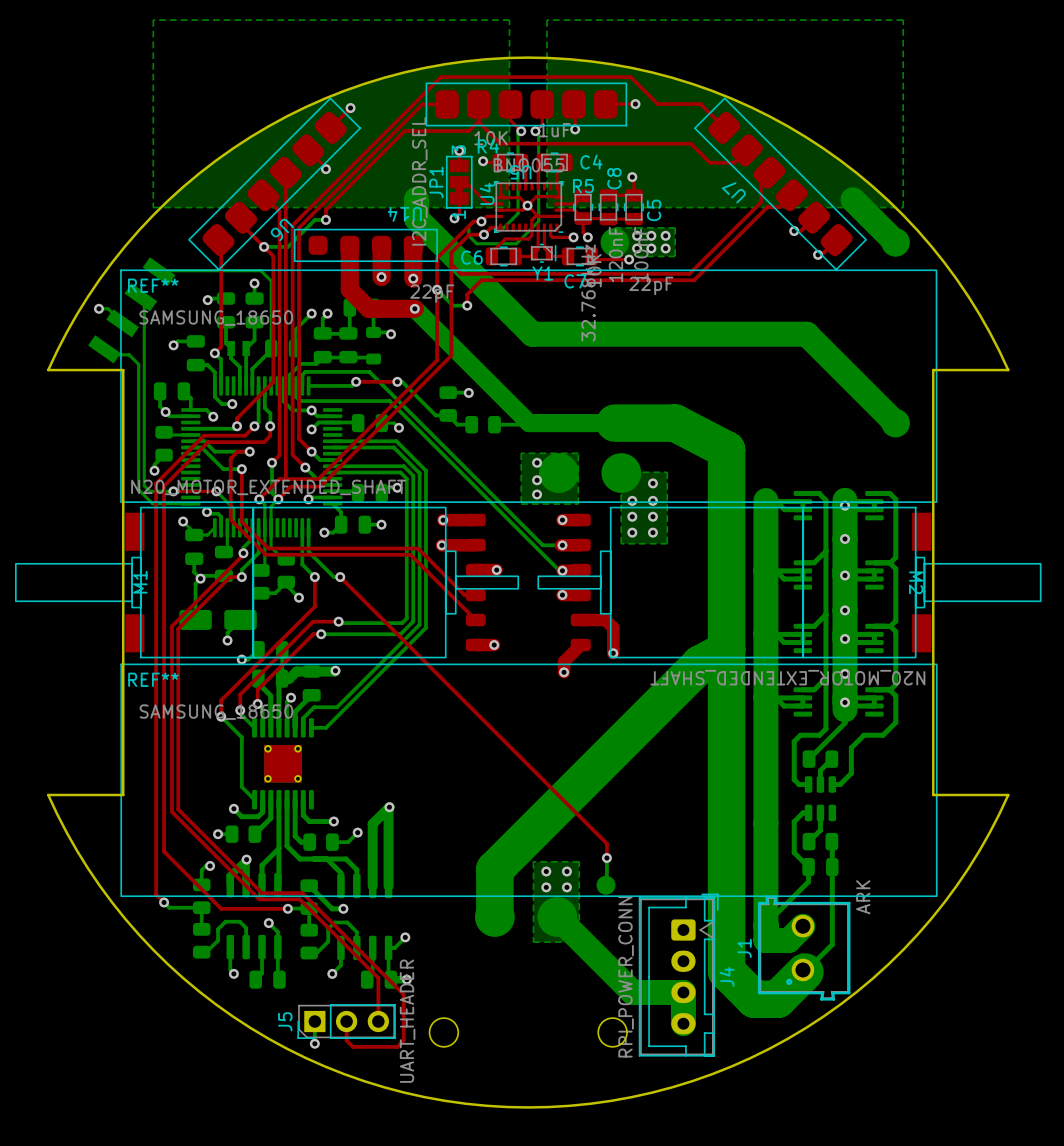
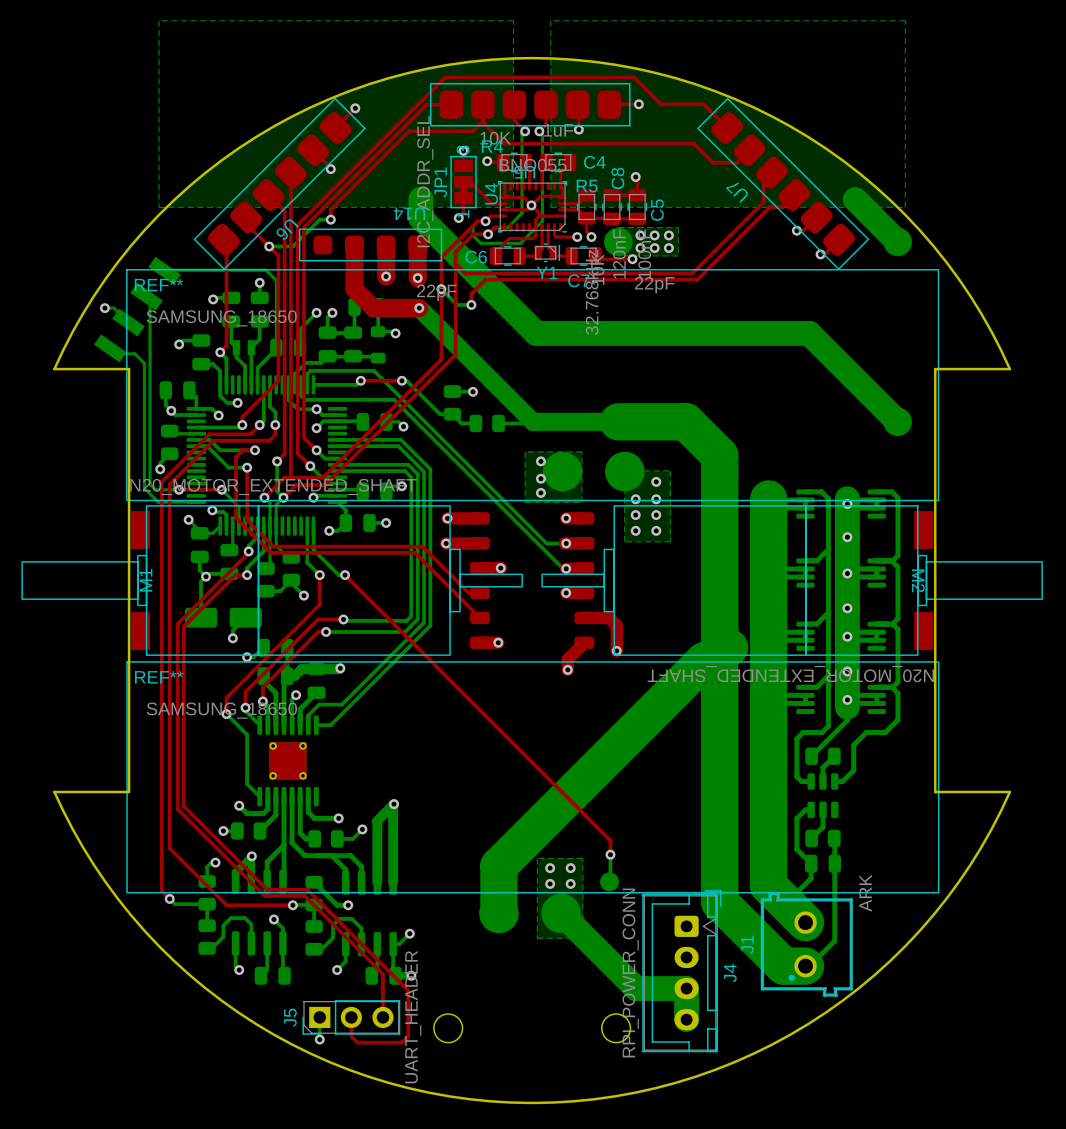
bottom track: (675, 423) (726, 449) (726, 971) (754, 999) (777, 999) (804, 971) -> (678, 421) (685, 421) (719, 455) (719, 902) (783, 966) (805, 966)
bottom track width: thin (765, 500) (765, 889) -> thick (768, 498) (768, 885)
bottom track: (765, 889) (765, 940) (788, 940) (802, 926) -> (768, 885) (805, 922)

